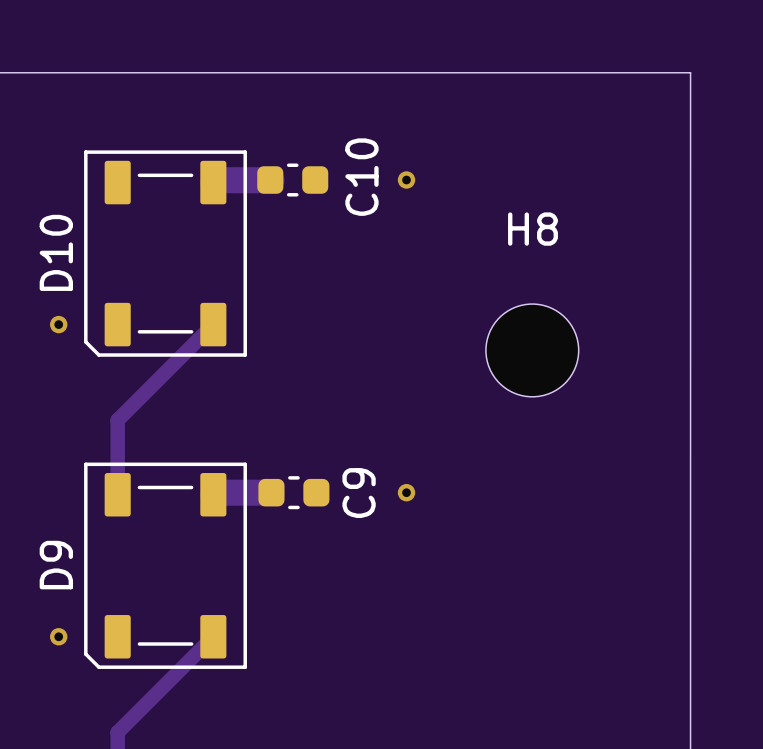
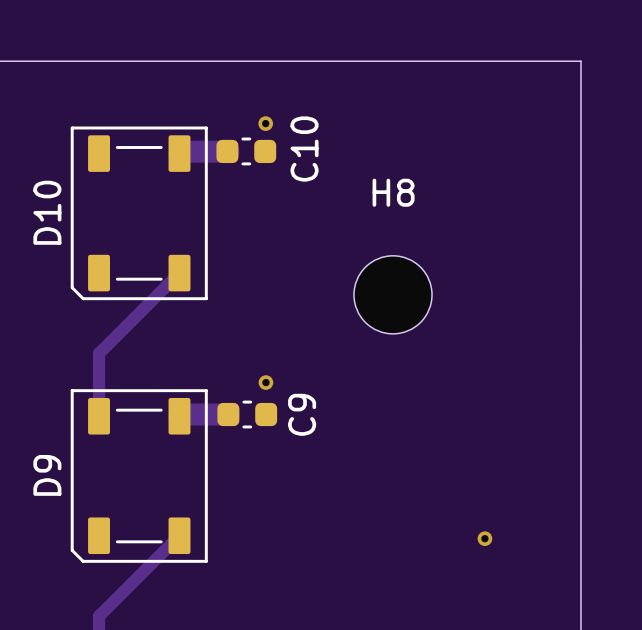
via position: (406, 180) -> (265, 123)
via: (58, 324) -> none
H8 position: (532, 350) -> (392, 294)
via position: (406, 492) -> (265, 382)
via: (58, 636) -> none
via: none -> (484, 538)

